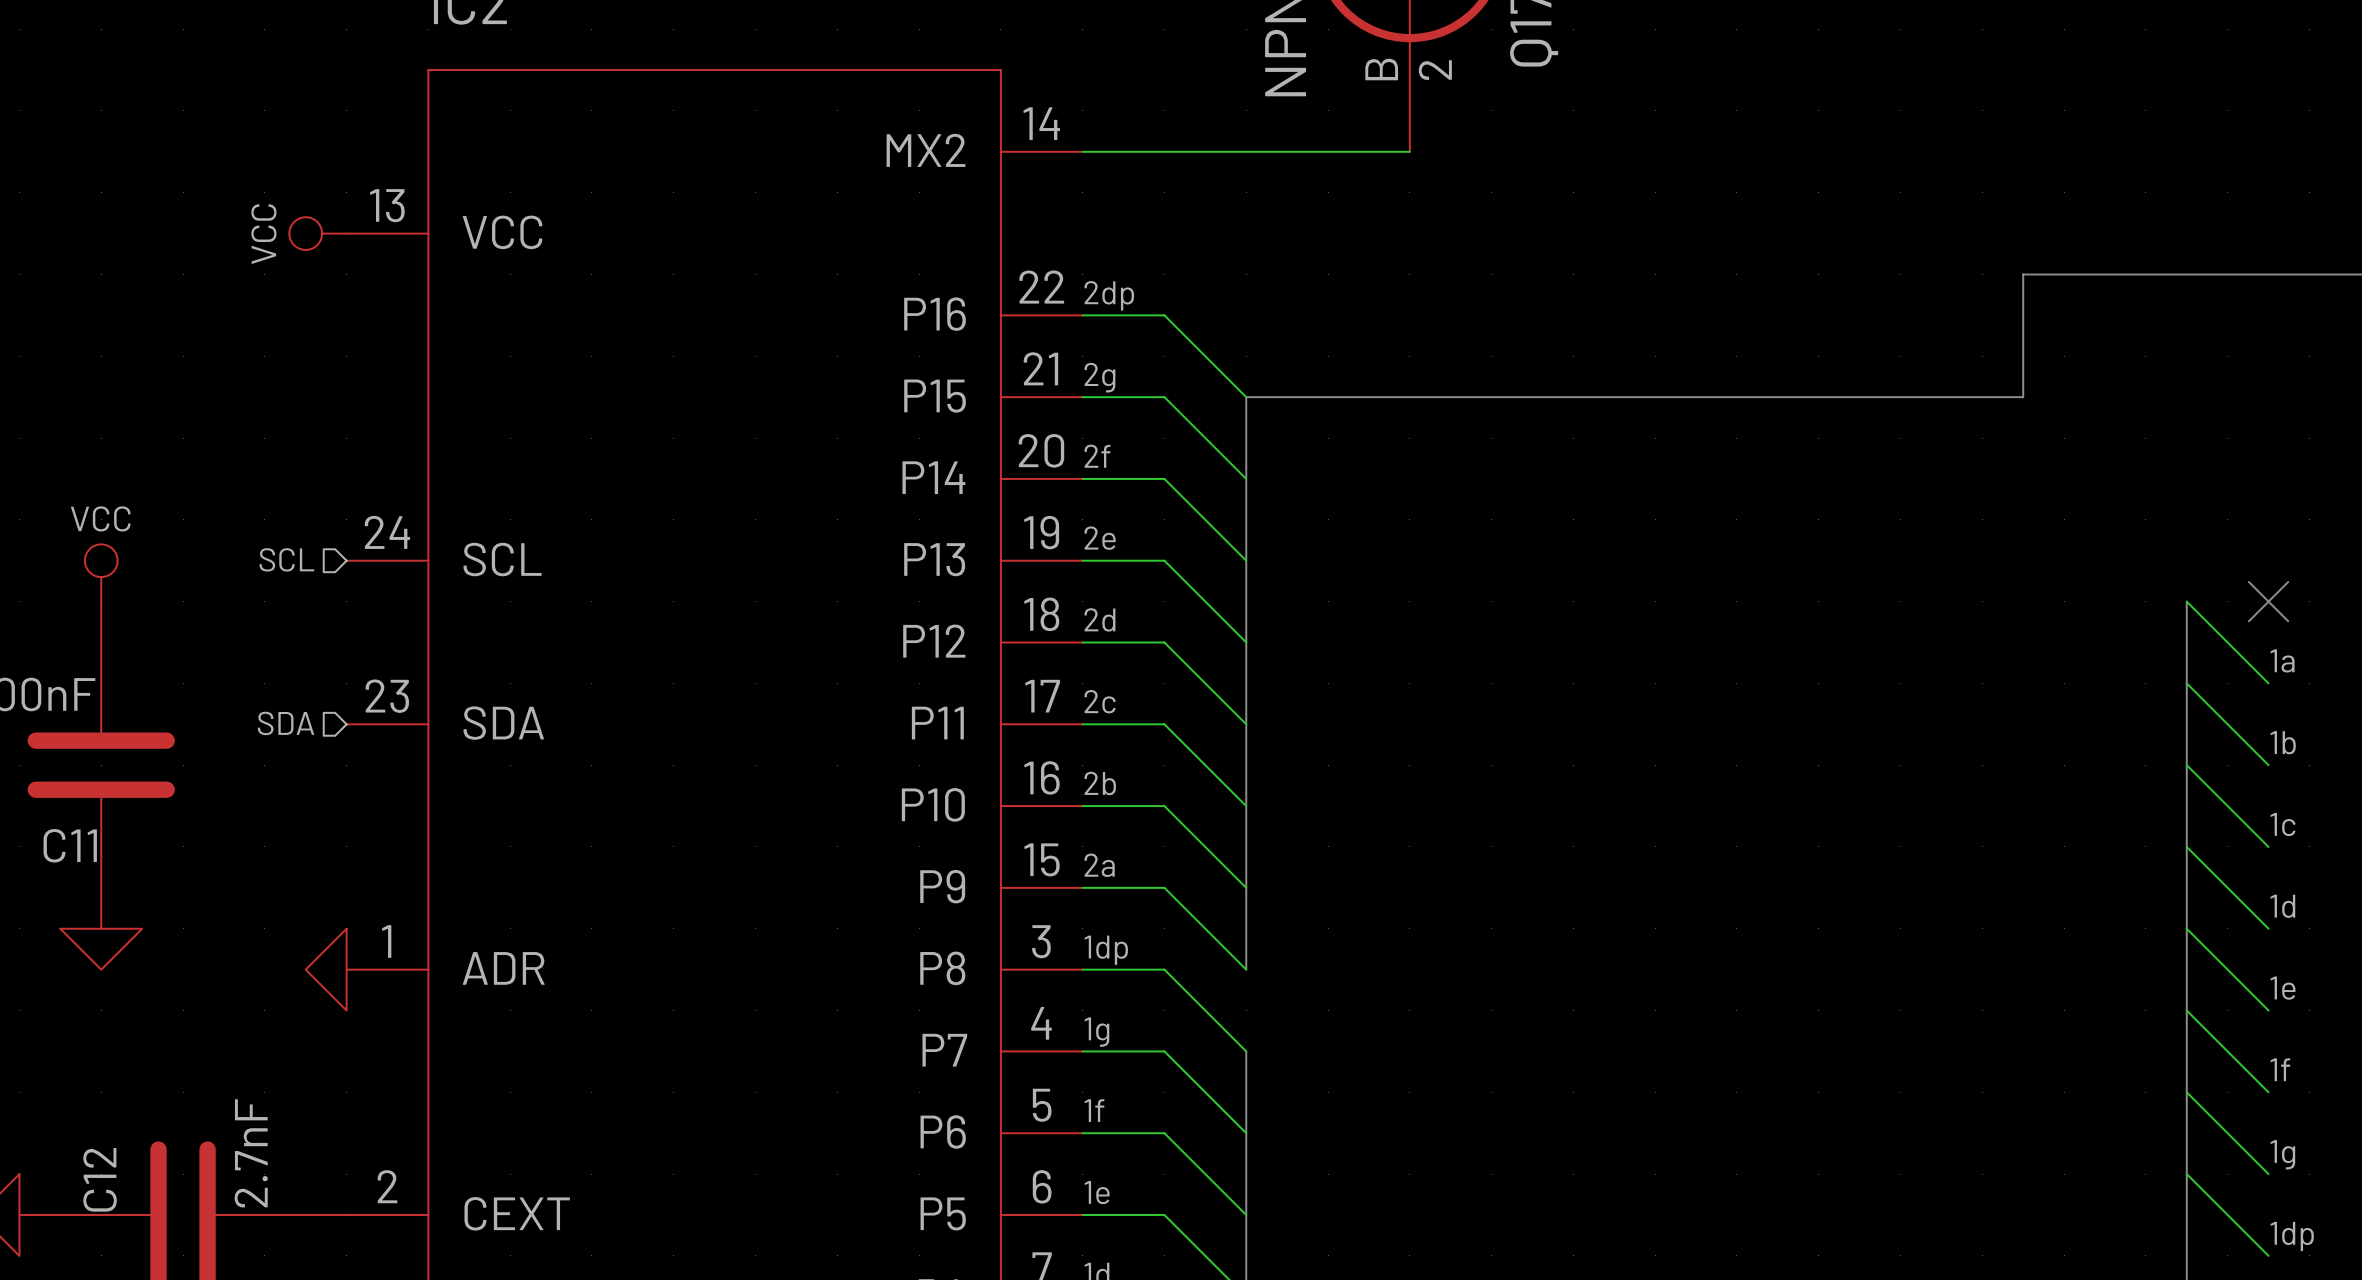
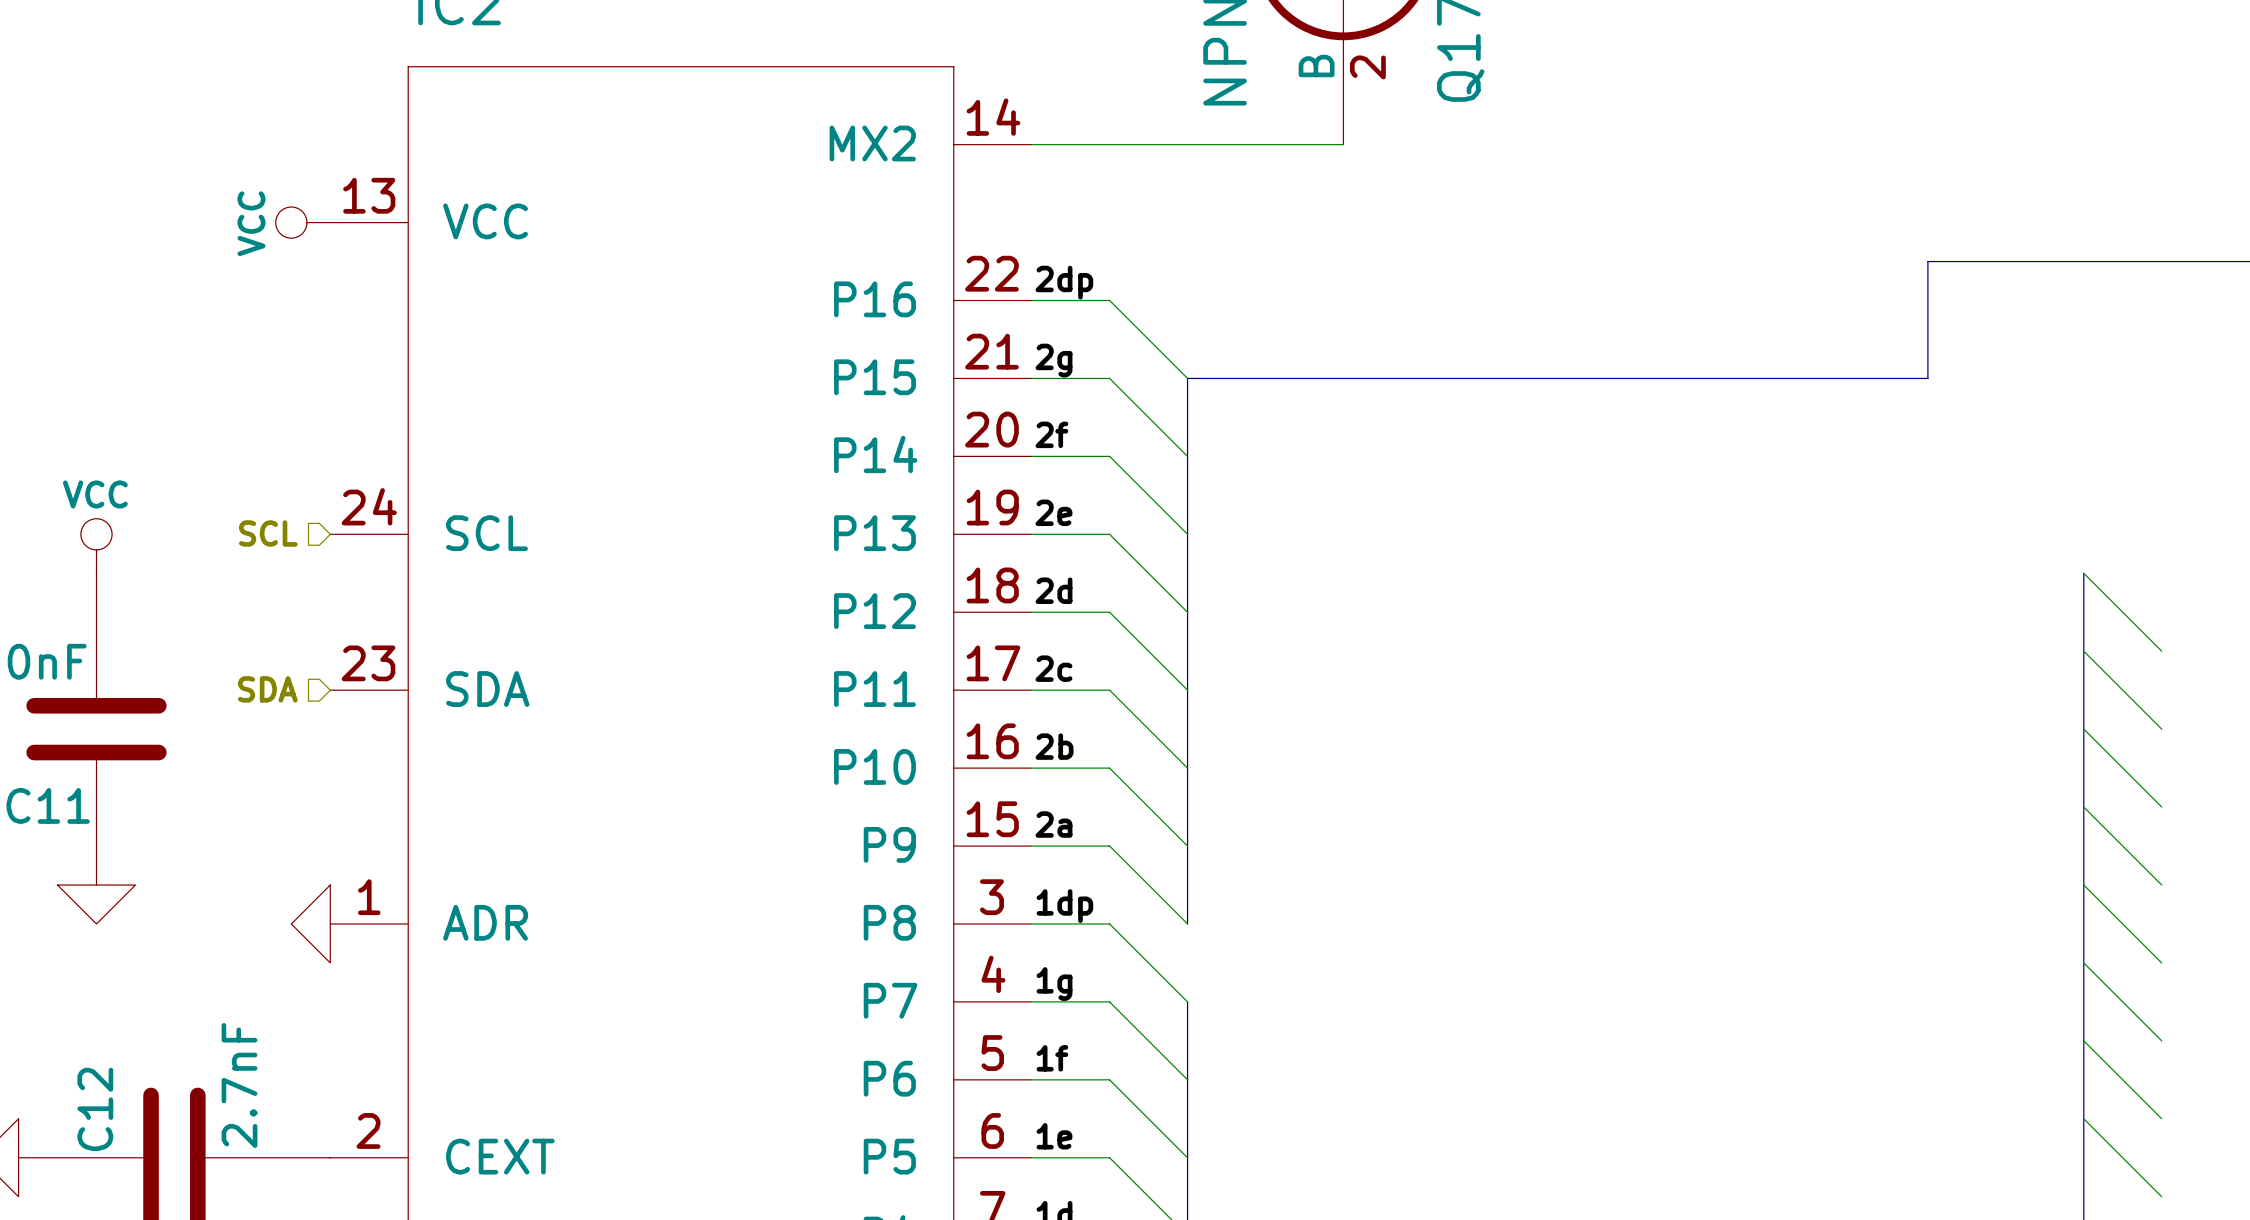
no-connect mark: (2268, 601) -> none
label: 1a (2282, 660) -> none
label: 1b (2283, 742) -> none
label: 1c (2282, 824) -> none
label: 1d (2282, 906) -> none
label: 1e (2282, 988) -> none
label: 1f (2280, 1069) -> none
label: 1g (2282, 1154) -> none
label: 1dp (2292, 1236) -> none

